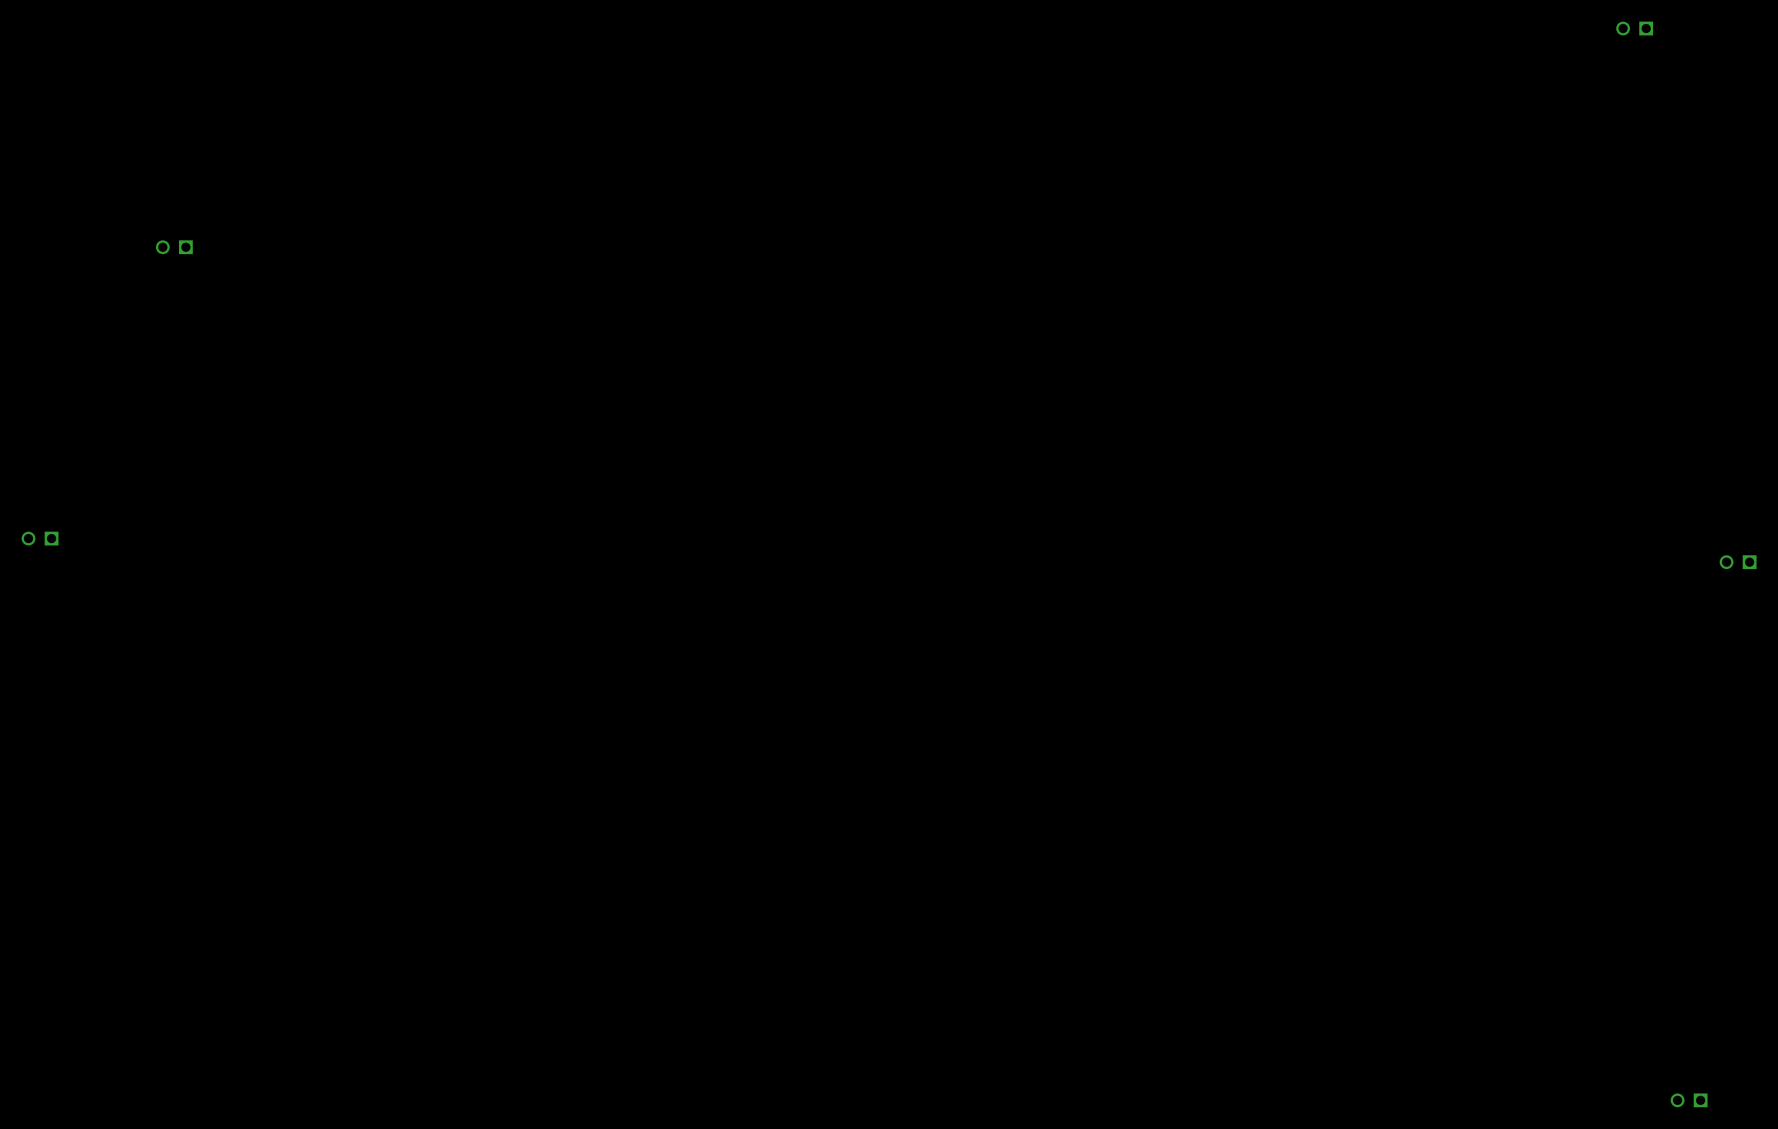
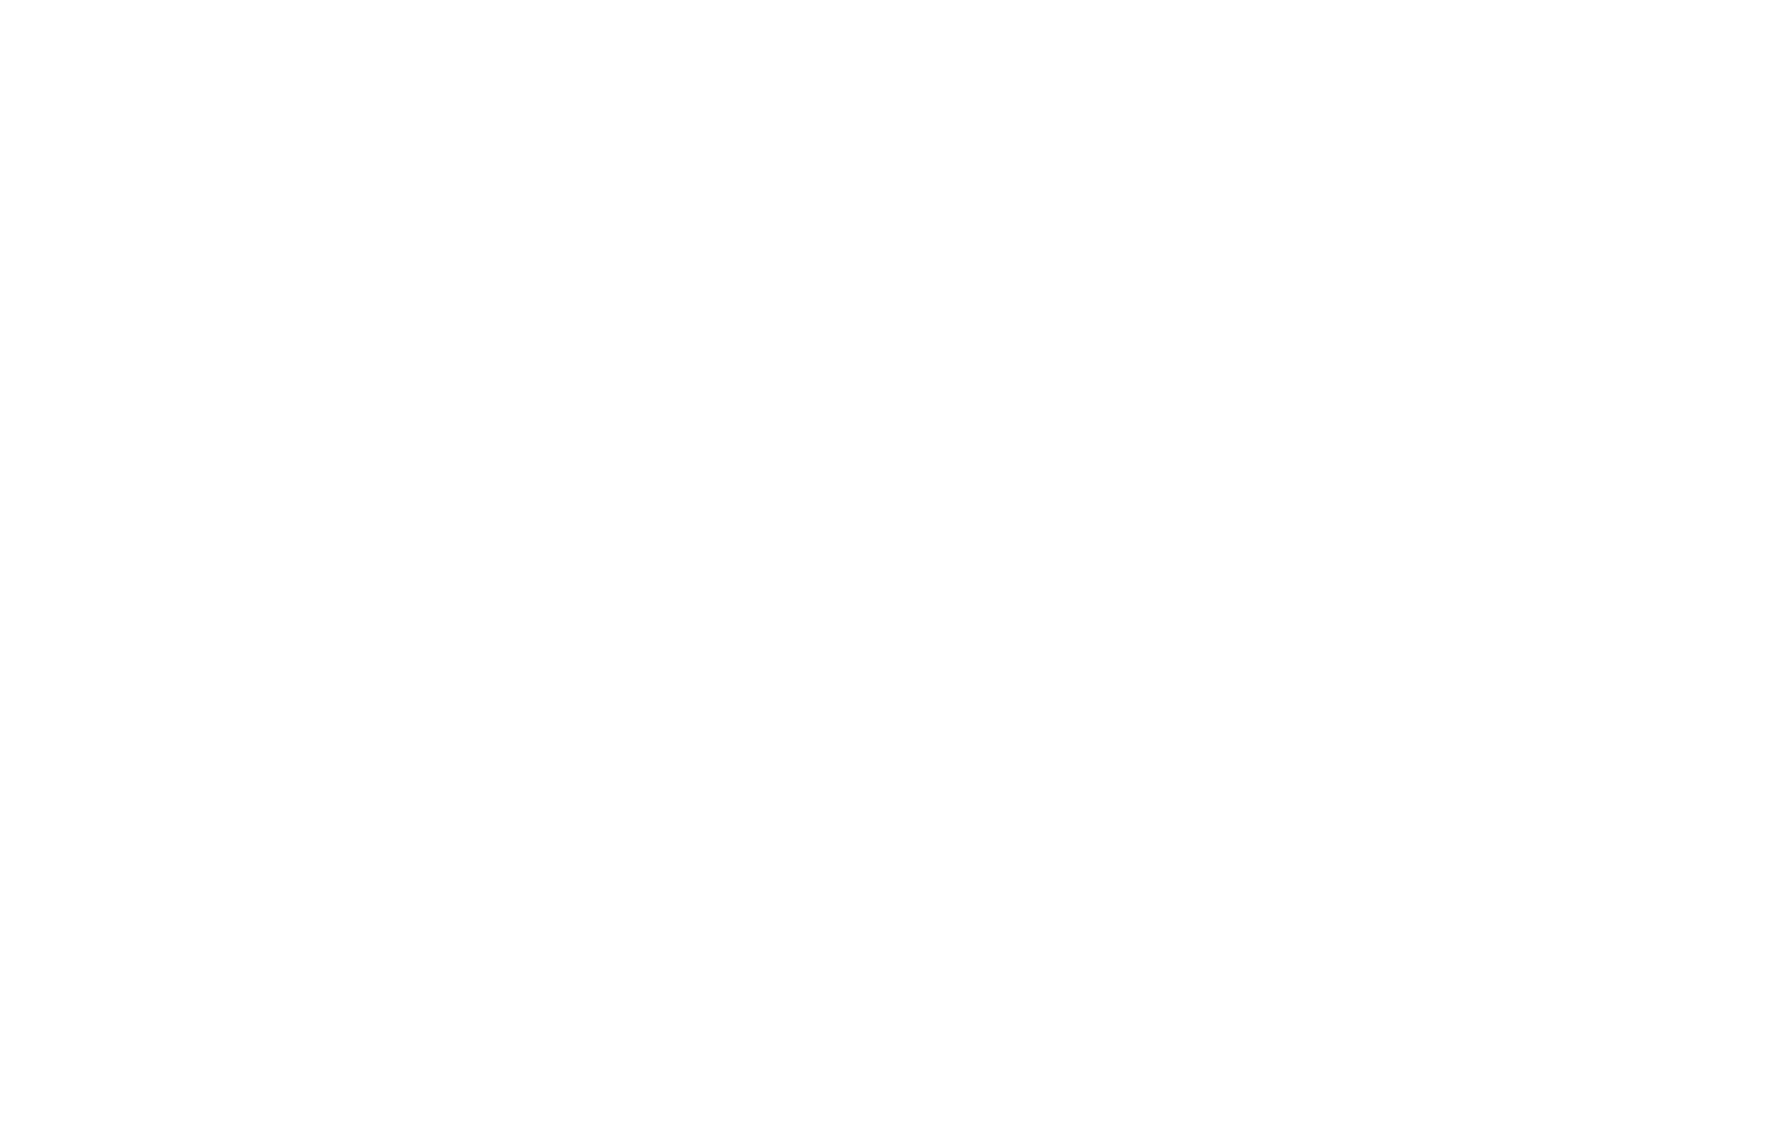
part: (1634, 28) -> none
part: (174, 247) -> none
part: (40, 538) -> none
part: (1738, 562) -> none
part: (1689, 1100) -> none

